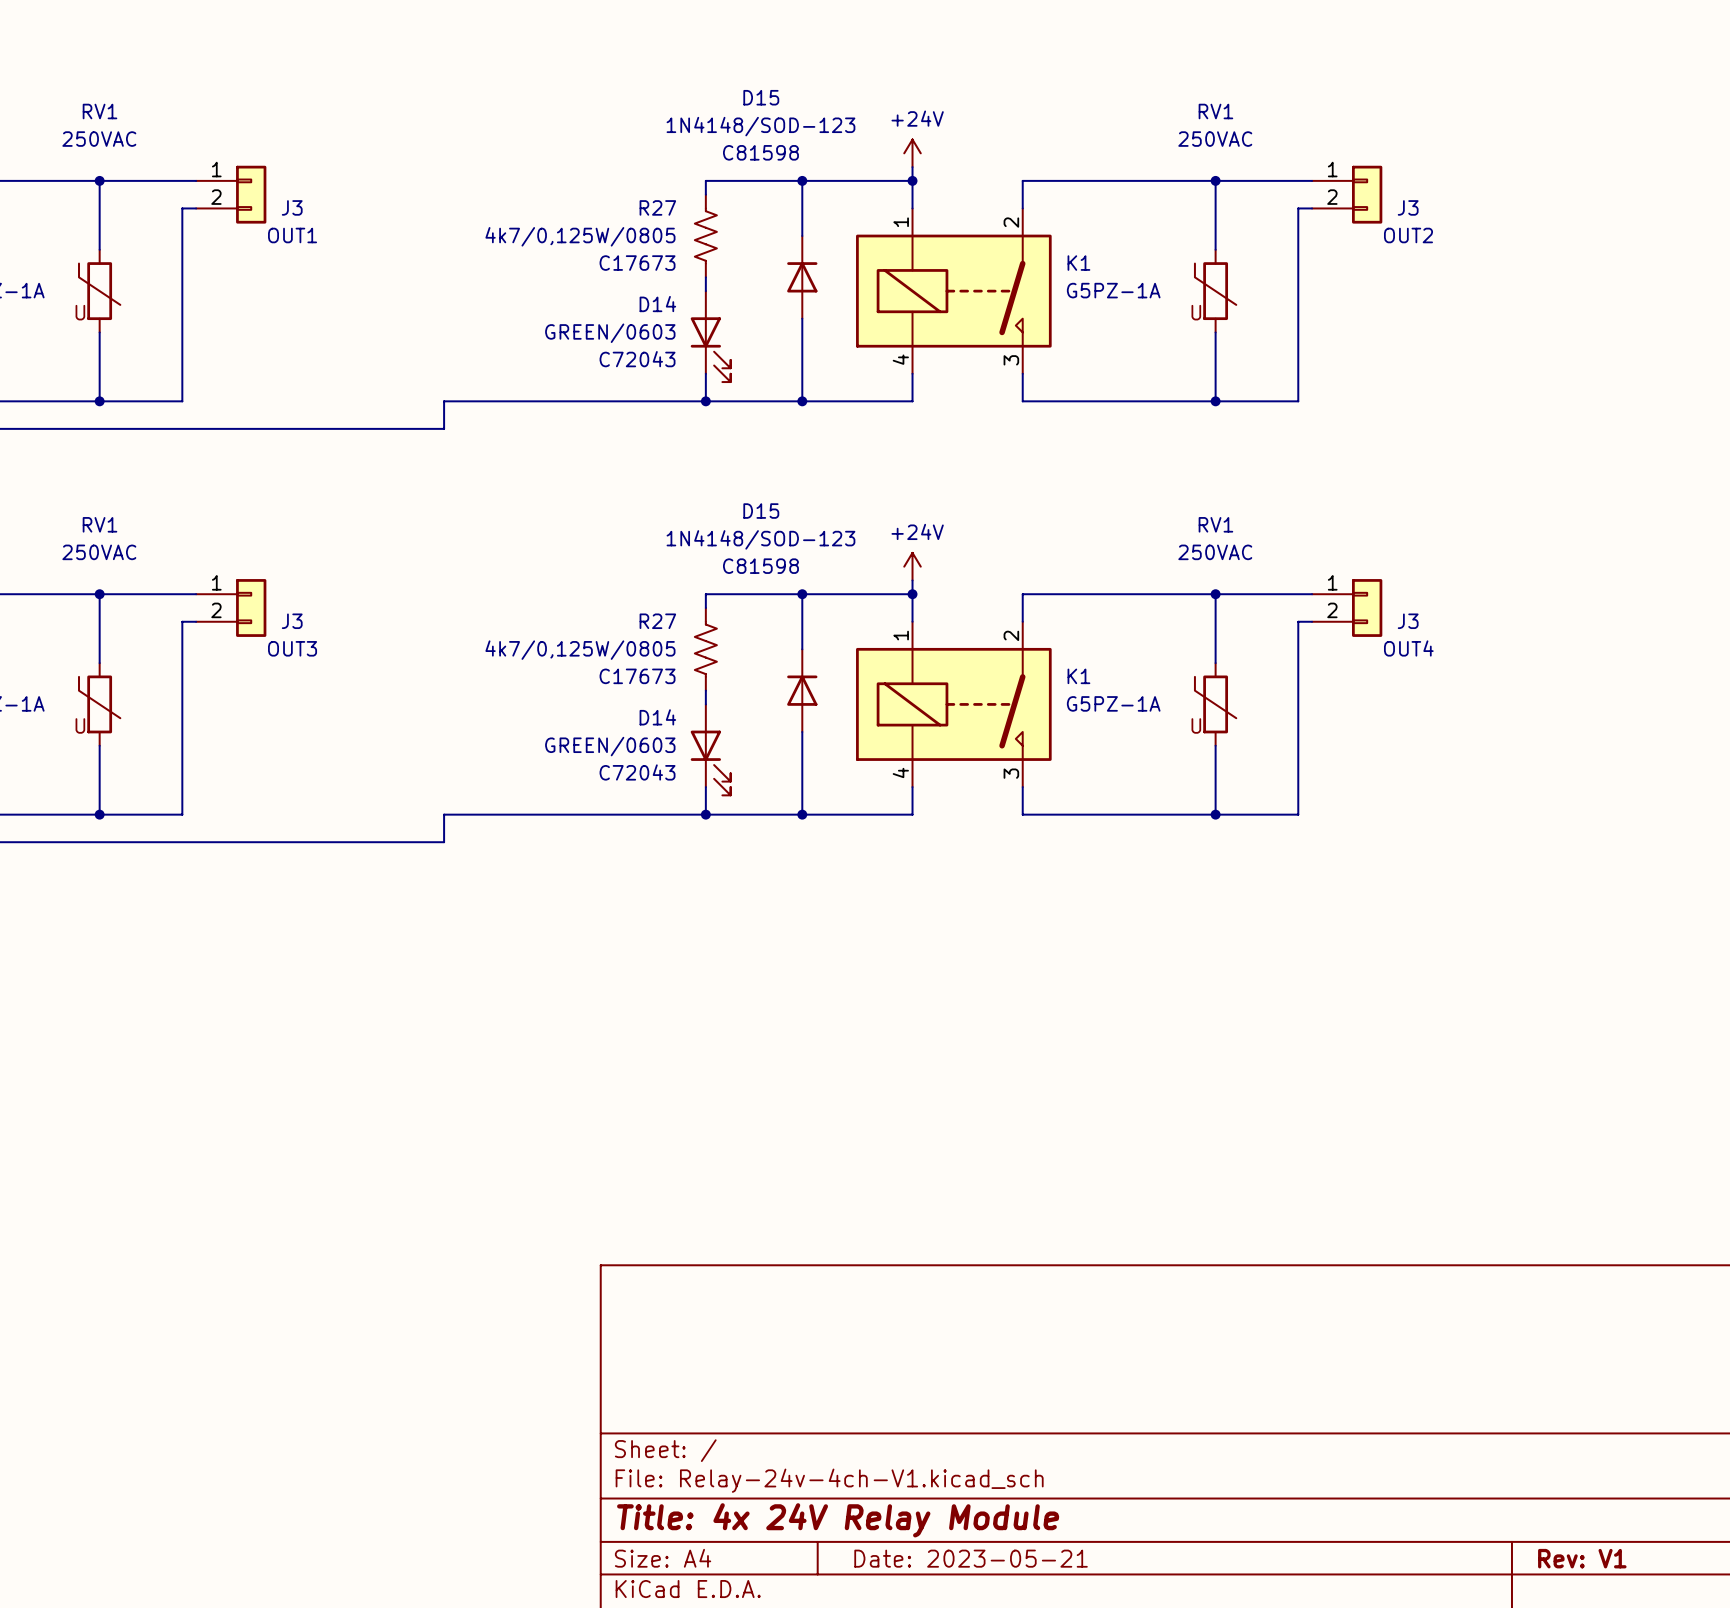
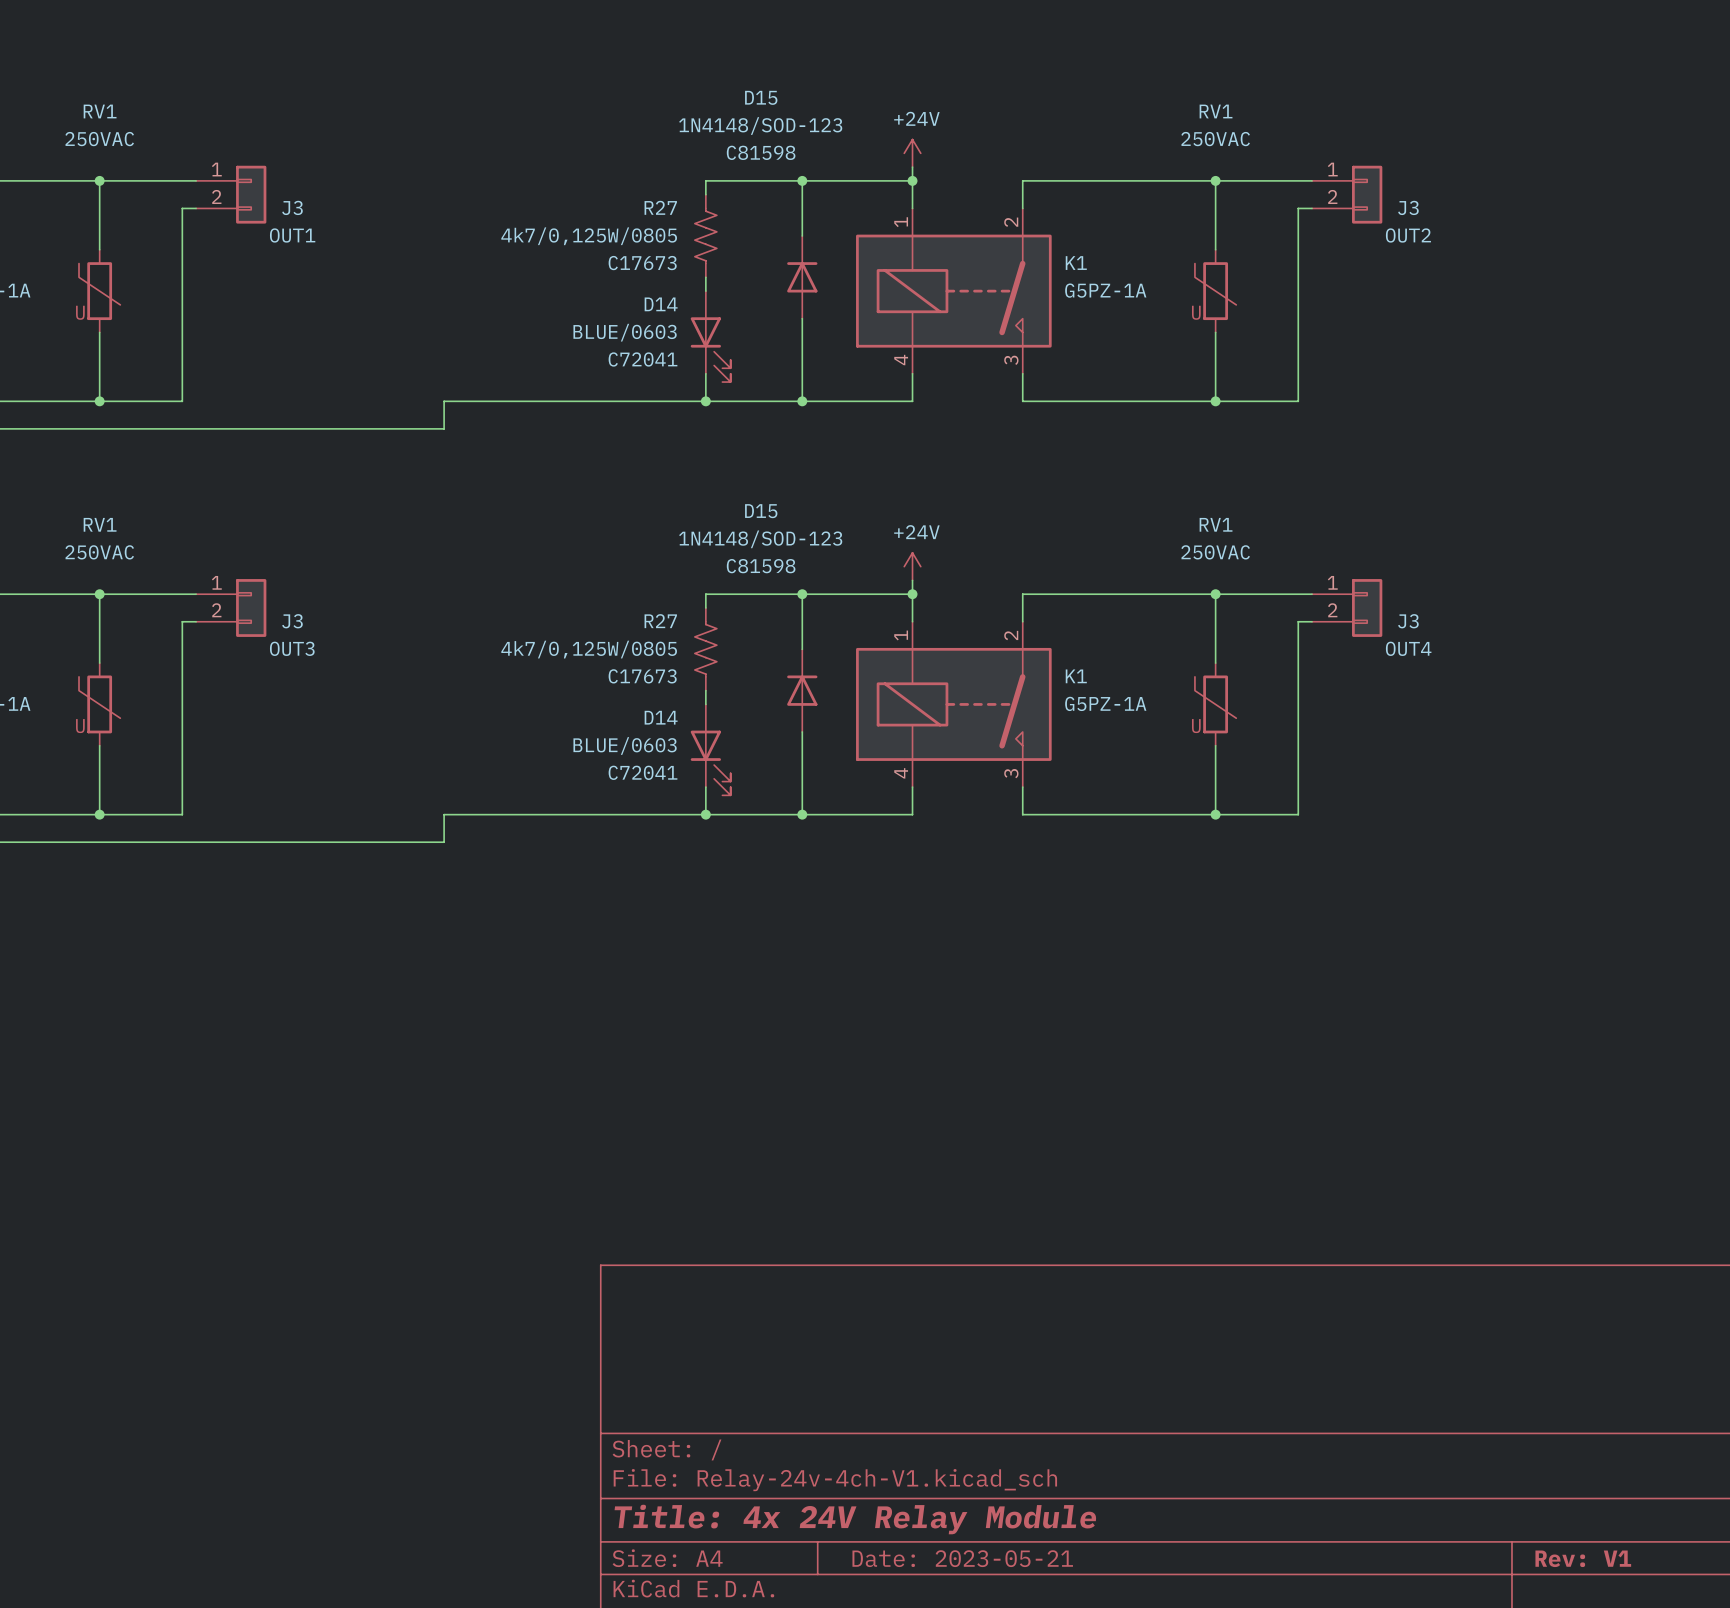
D14 value: GREEN/0603 (610, 333) -> BLUE/0603 (625, 332)
D14 text: C72043 (637, 359) -> C72041 (643, 359)
D14 value: GREEN/0603 (610, 746) -> BLUE/0603 (625, 745)
D14 text: C72043 (637, 772) -> C72041 (643, 772)

